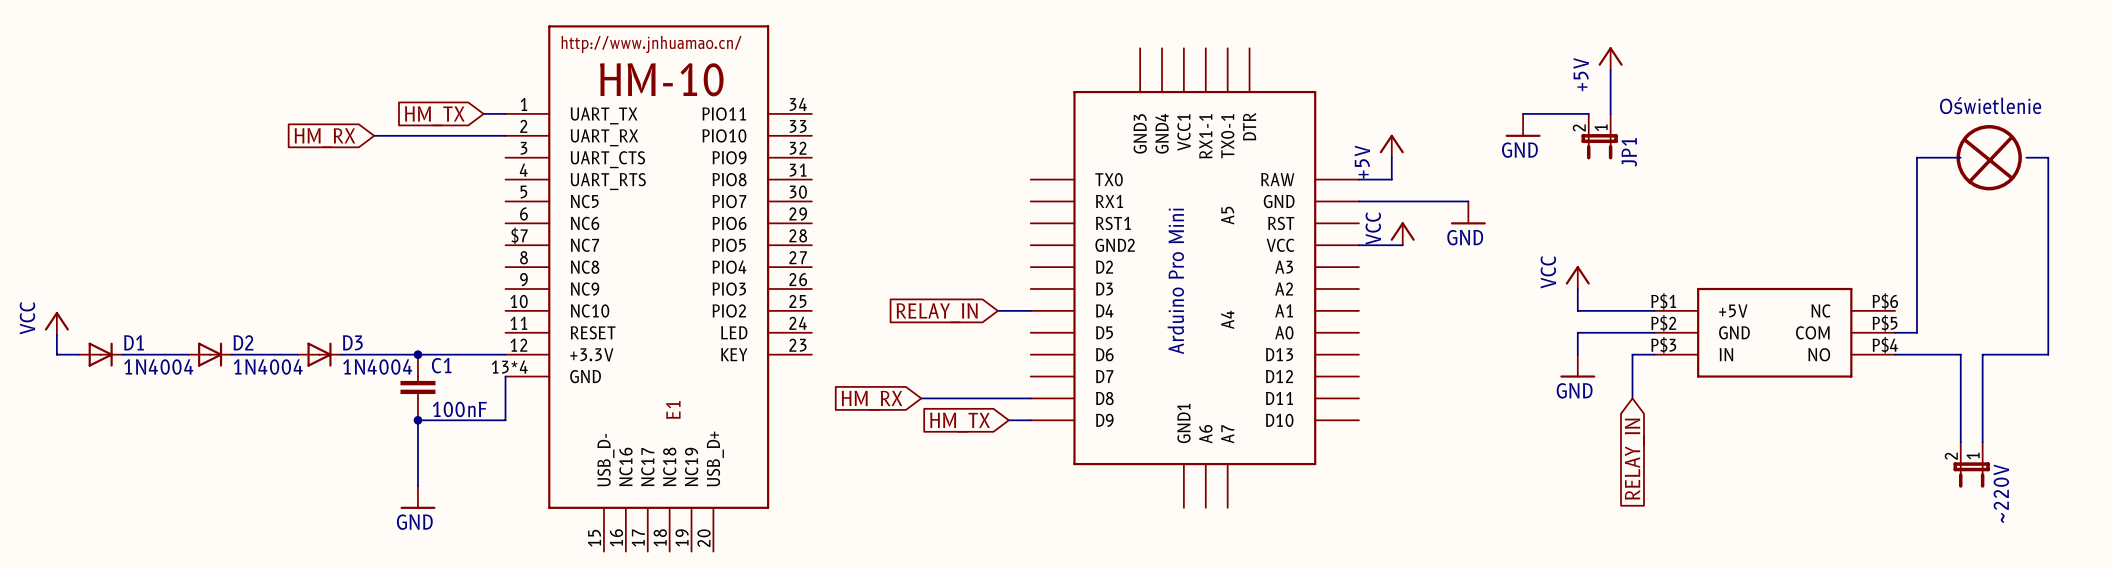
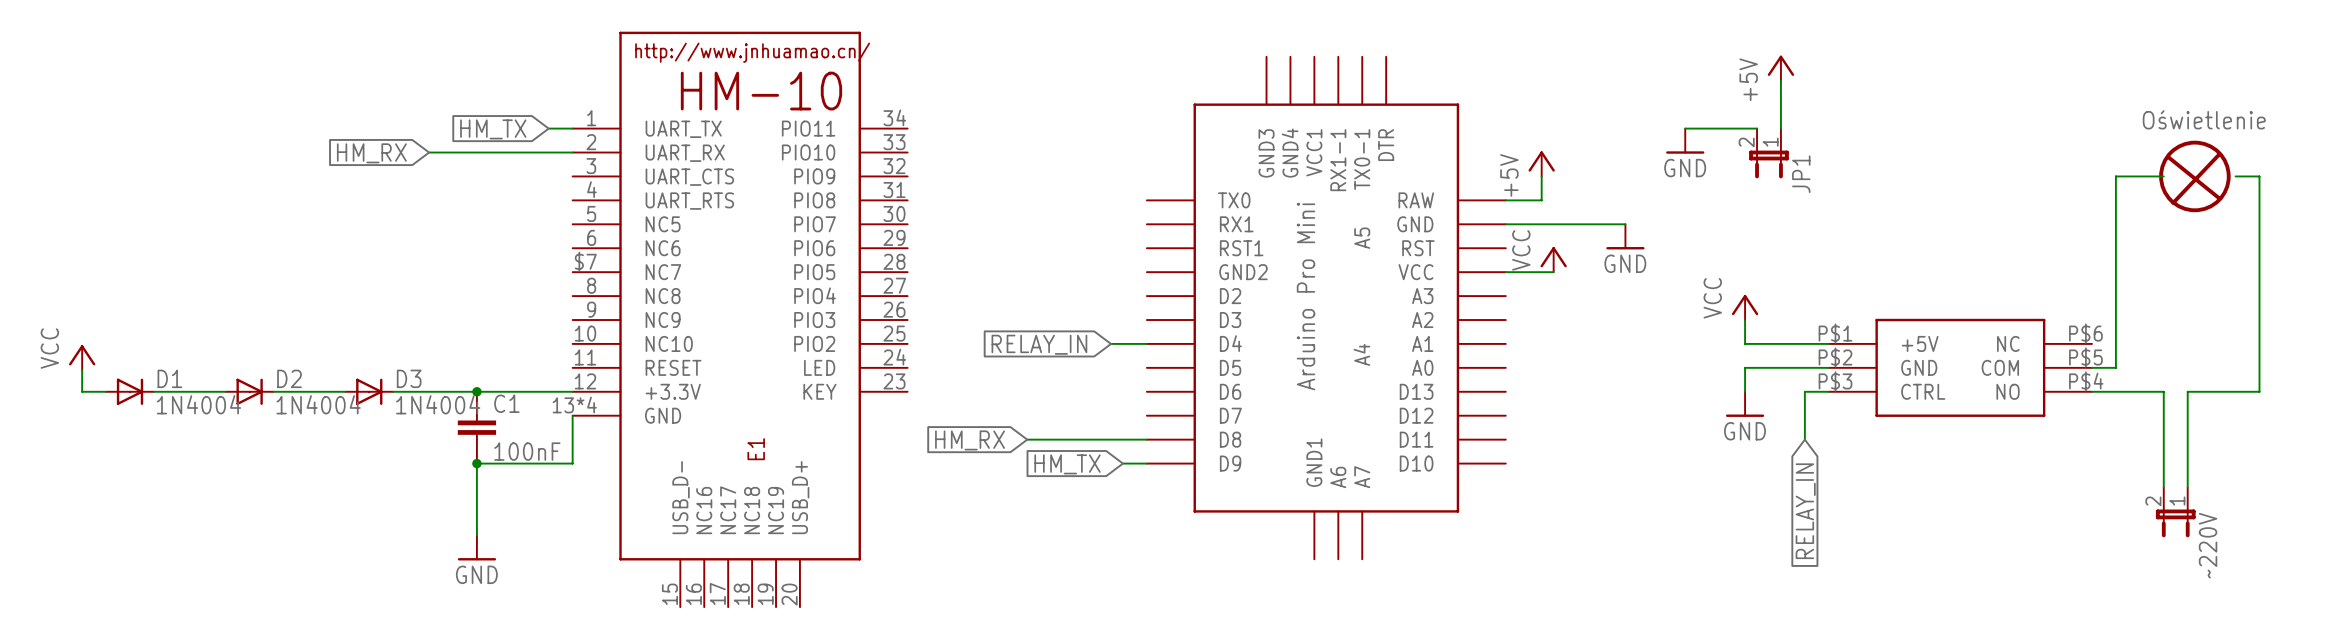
part pin name: IN (1726, 354) -> CTRL (1923, 391)

